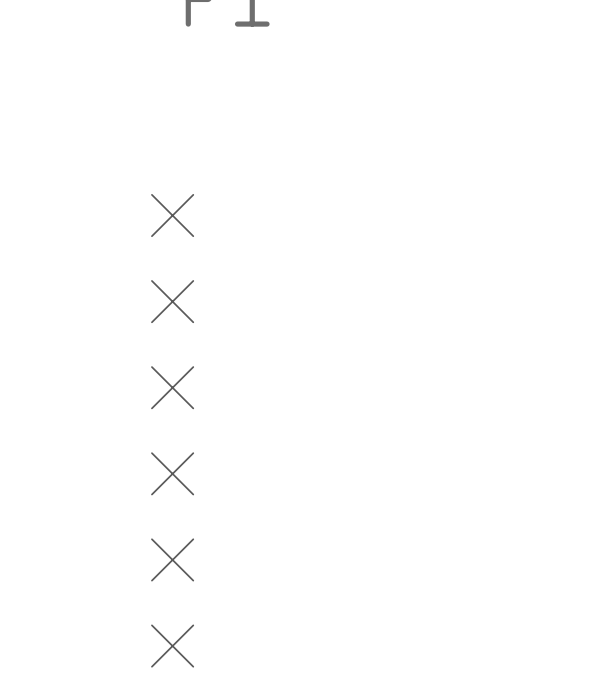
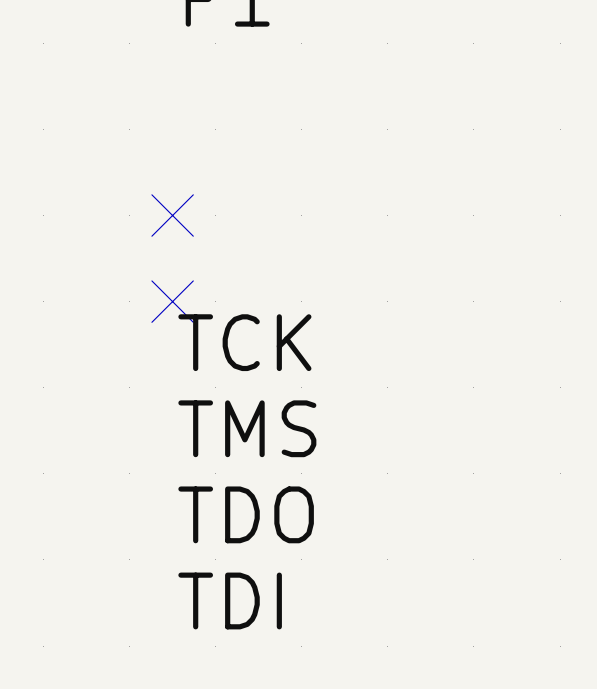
label: none -> TCK (244, 342)
no-connect mark: (172, 387) -> none
label: none -> TMS (247, 428)
no-connect mark: (172, 473) -> none
label: none -> TDO (246, 514)
no-connect mark: (172, 559) -> none
label: none -> TDI (230, 600)
no-connect mark: (172, 646) -> none

